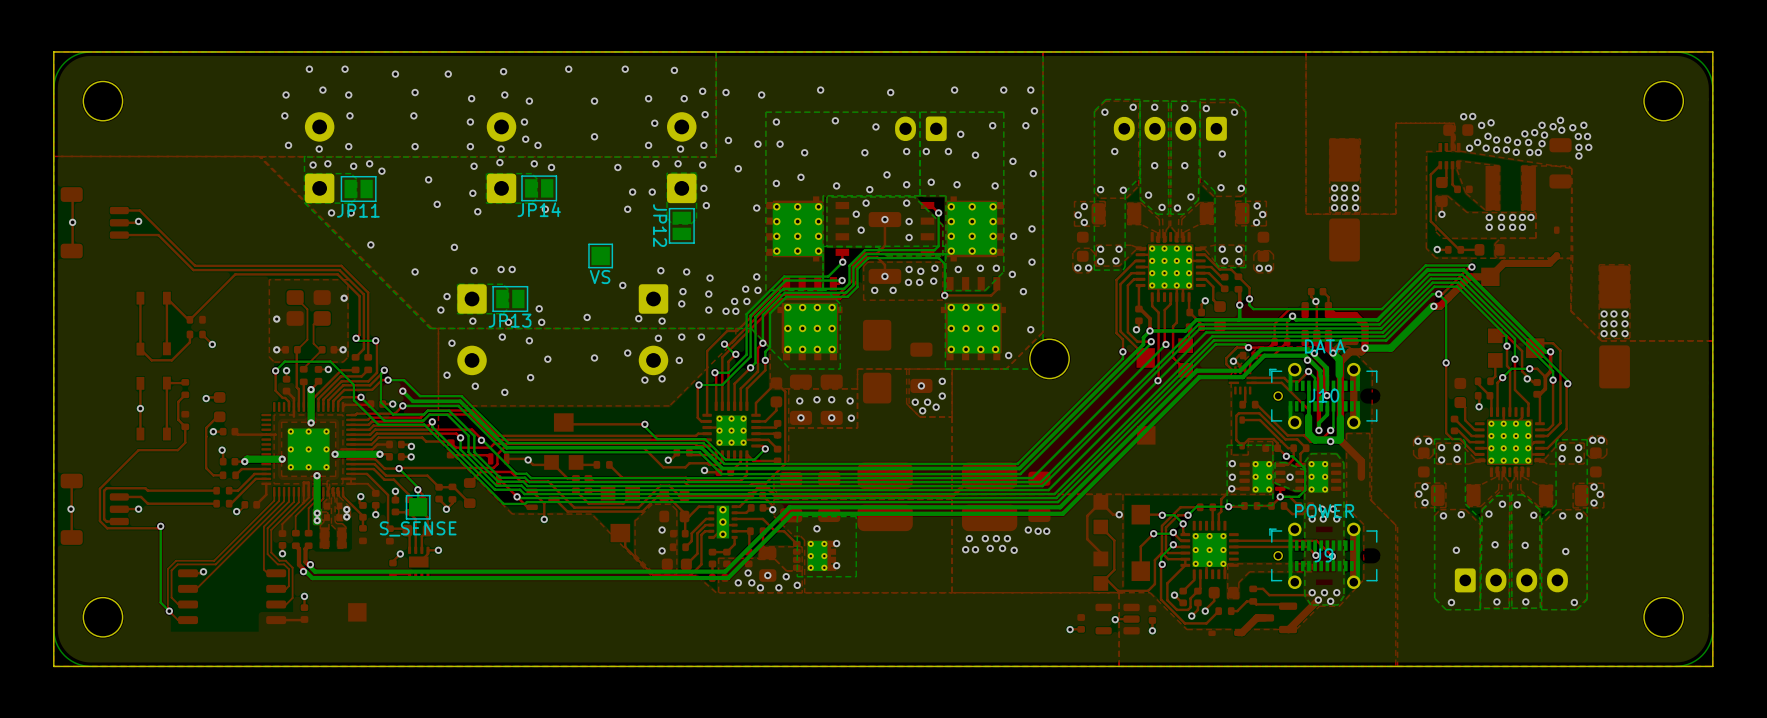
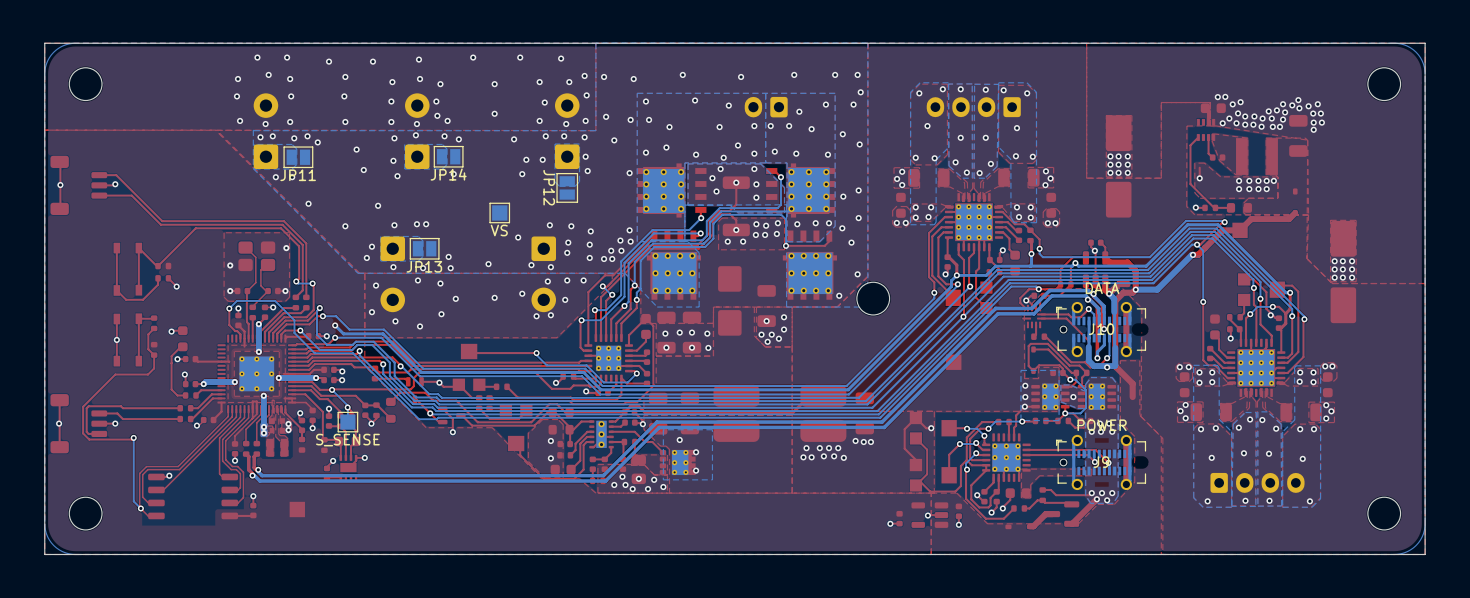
top track: (1446, 165) (1446, 178) (1441, 182) -> none
part: (1441, 192) -> none

